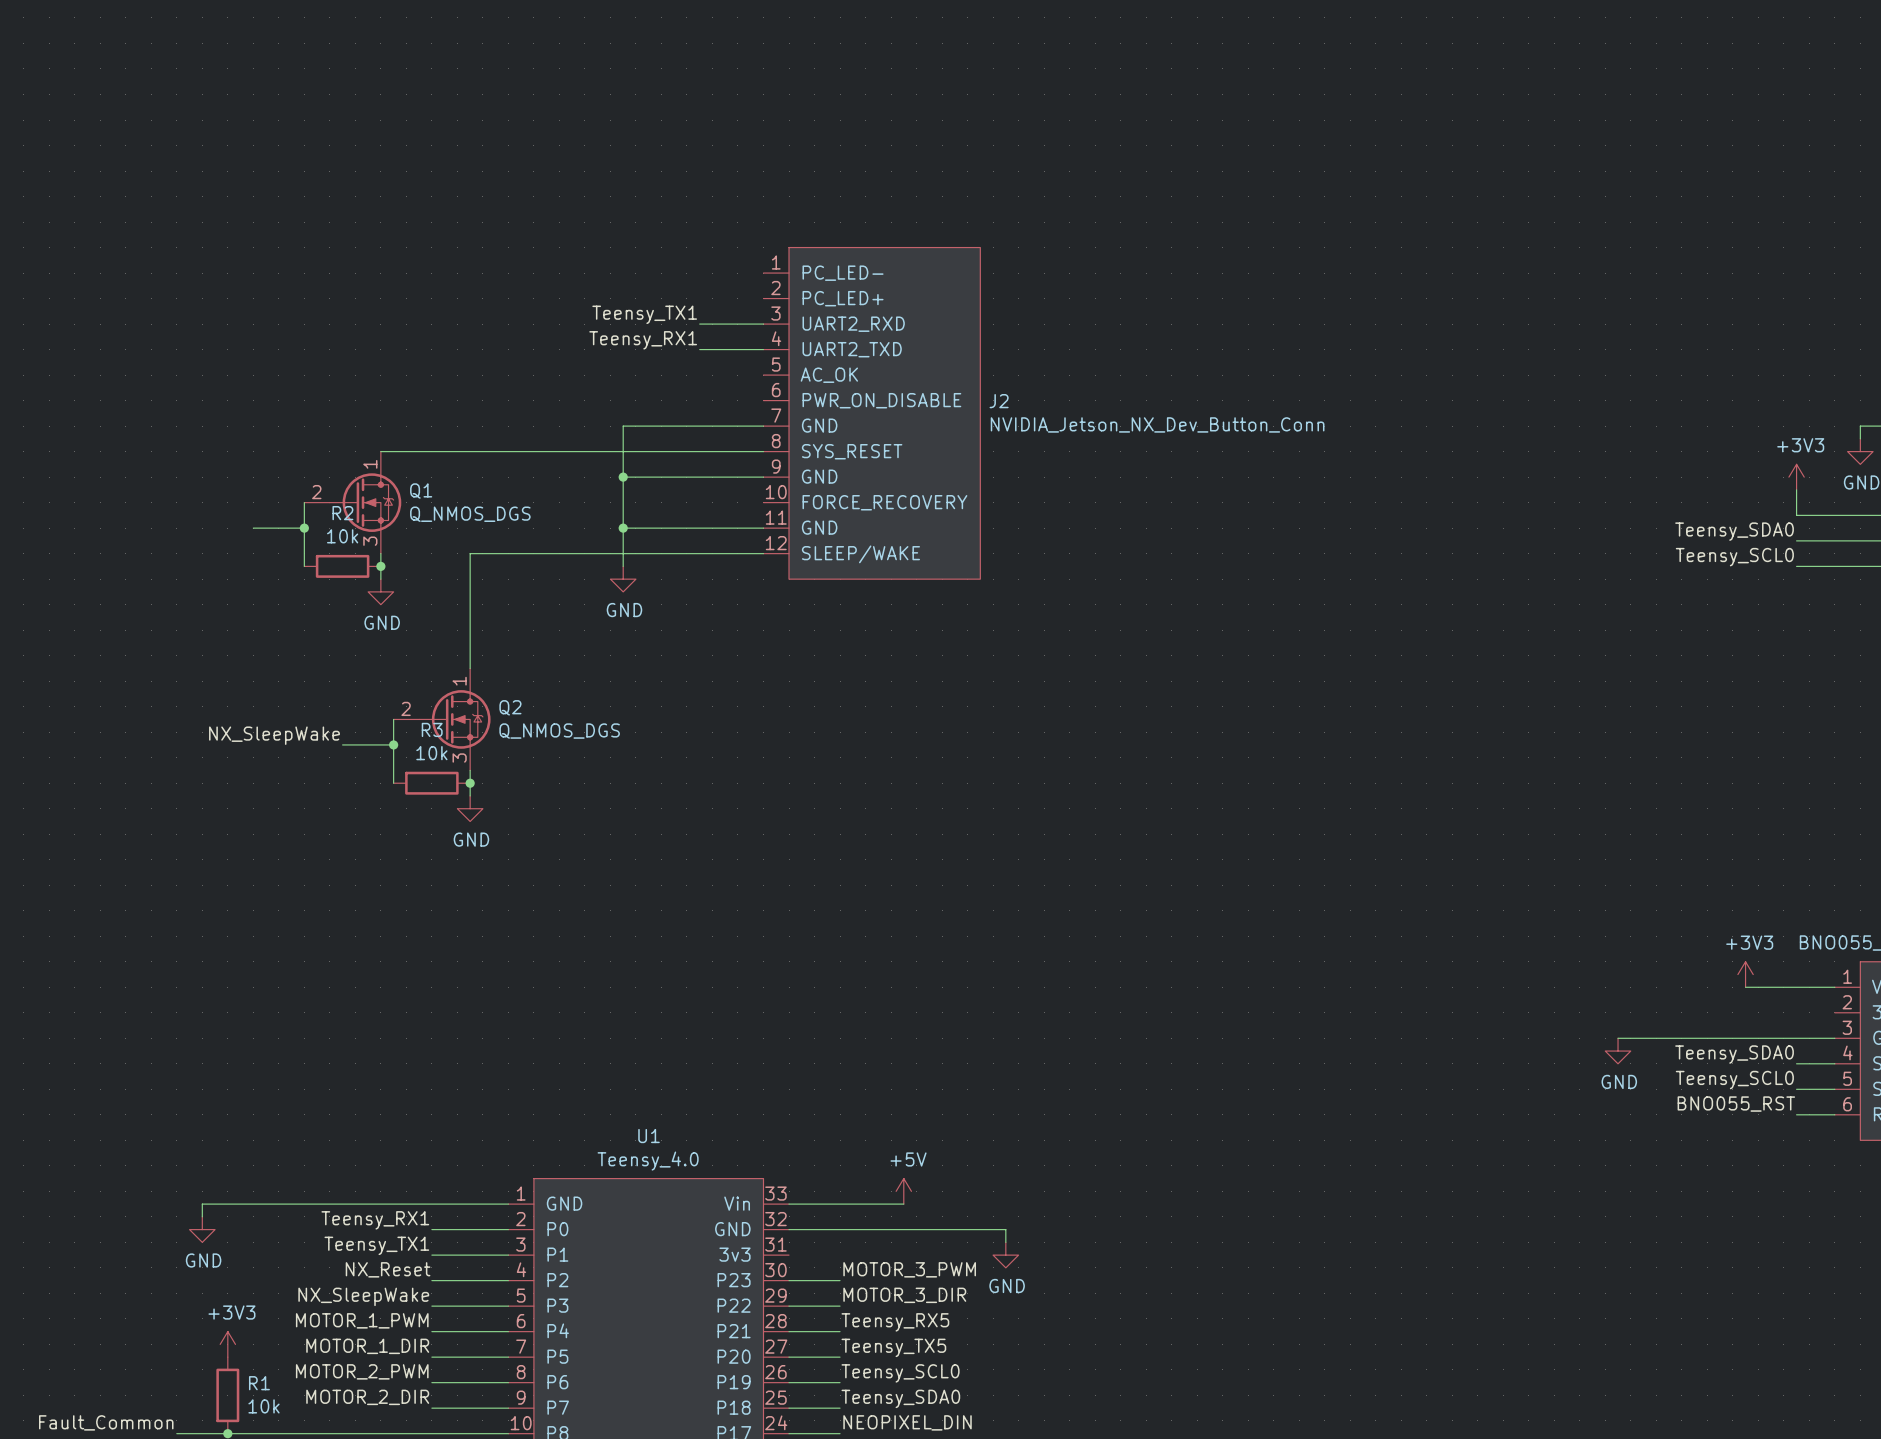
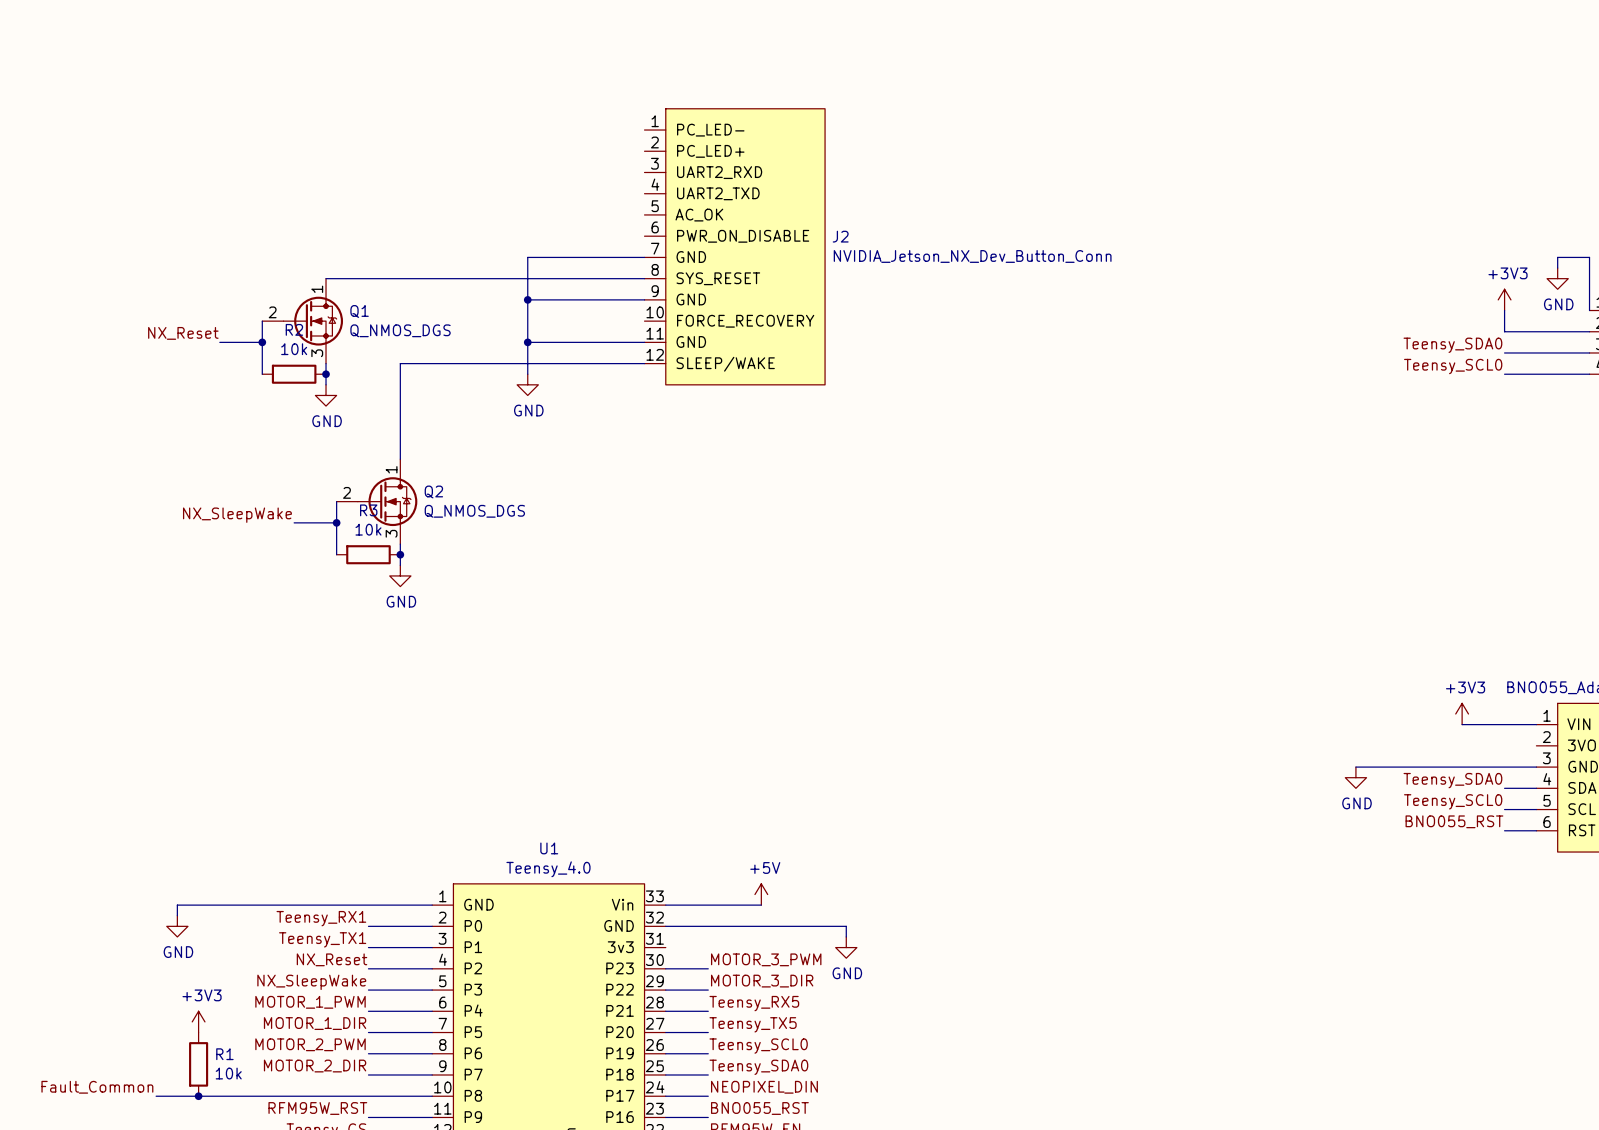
label: Teensy_TX1 (644, 314) -> none
wire: (699, 324) (763, 324) -> none
label: Teensy_RX1 (643, 340) -> none
wire: (699, 349) (763, 349) -> none
label: none -> NX_Reset (183, 333)

